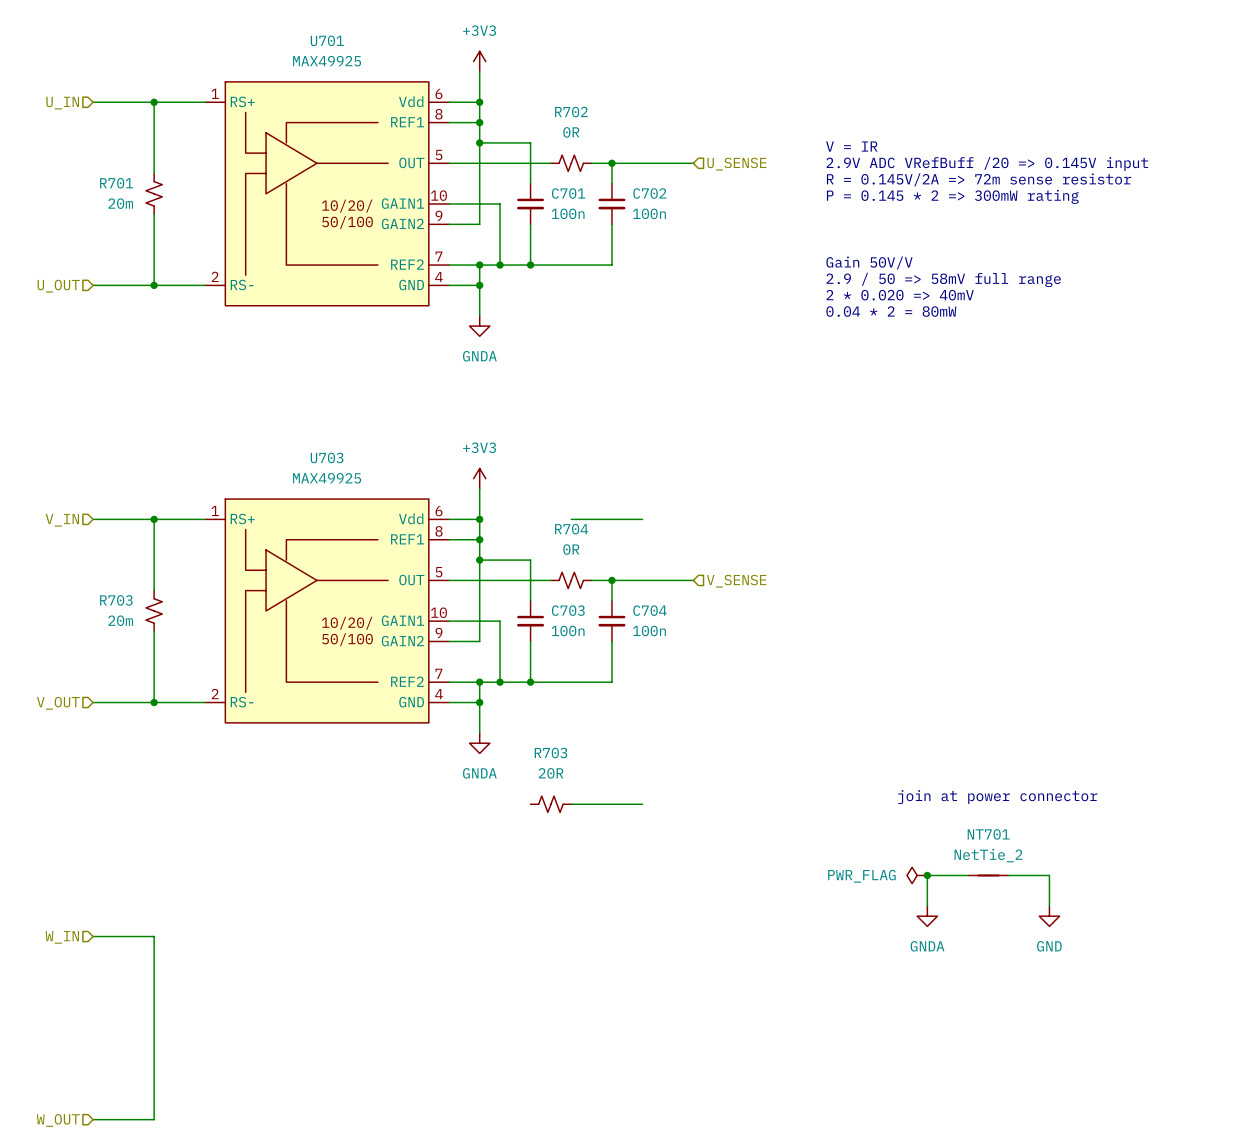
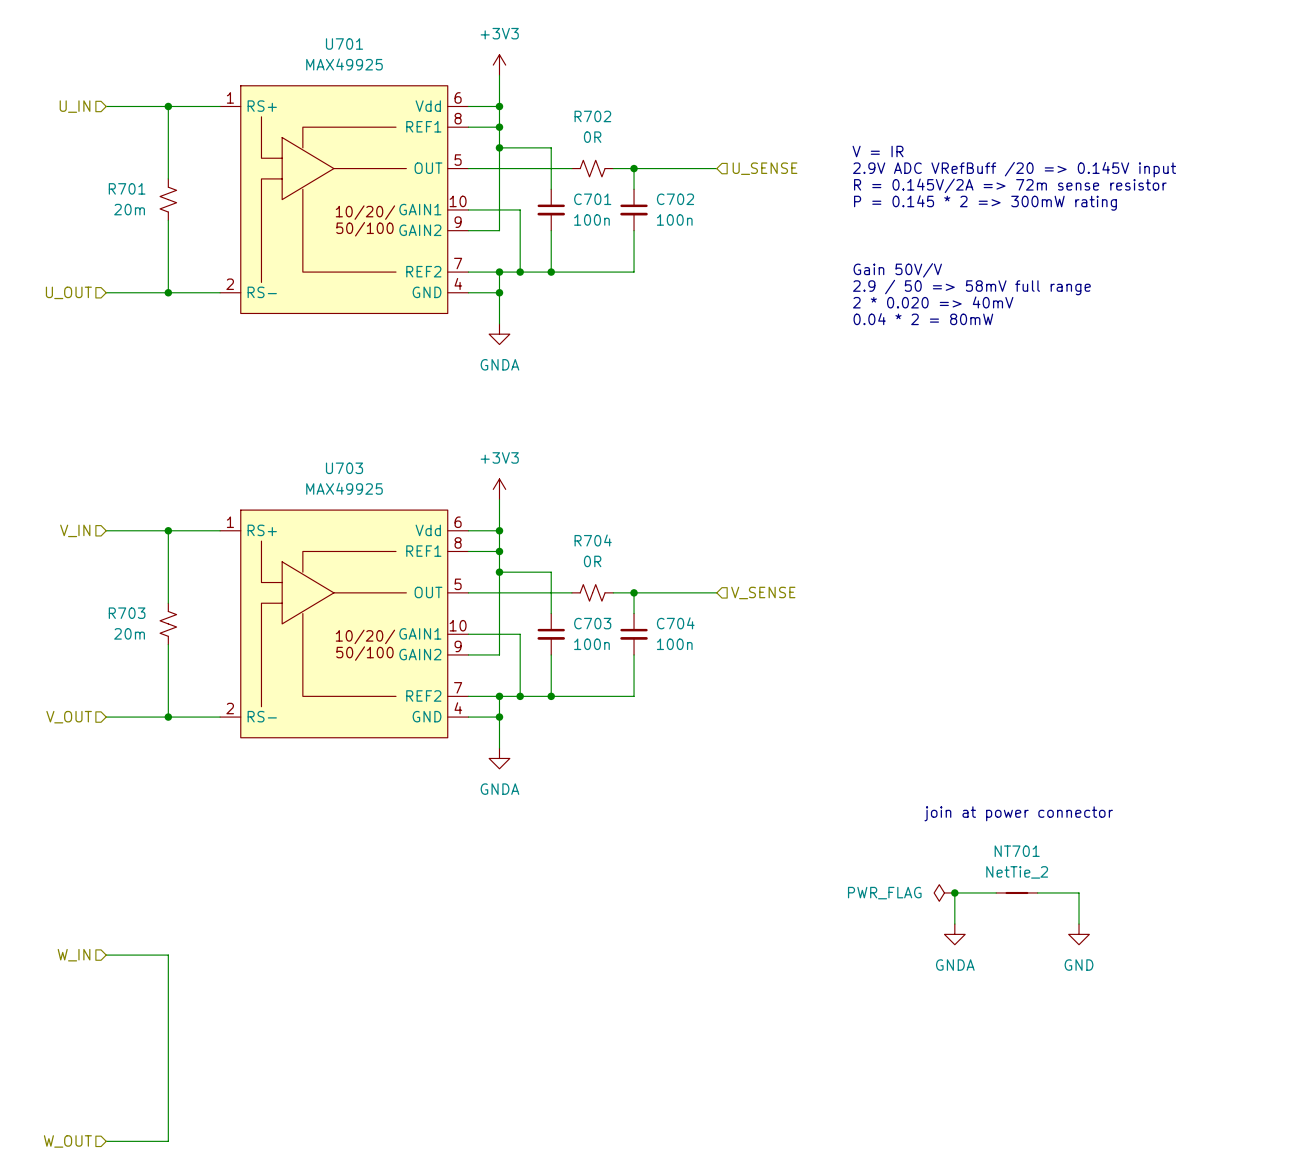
wire: (571, 519) (642, 519) -> none
R703: 20R (550, 804) -> none
wire: (571, 804) (642, 804) -> none

